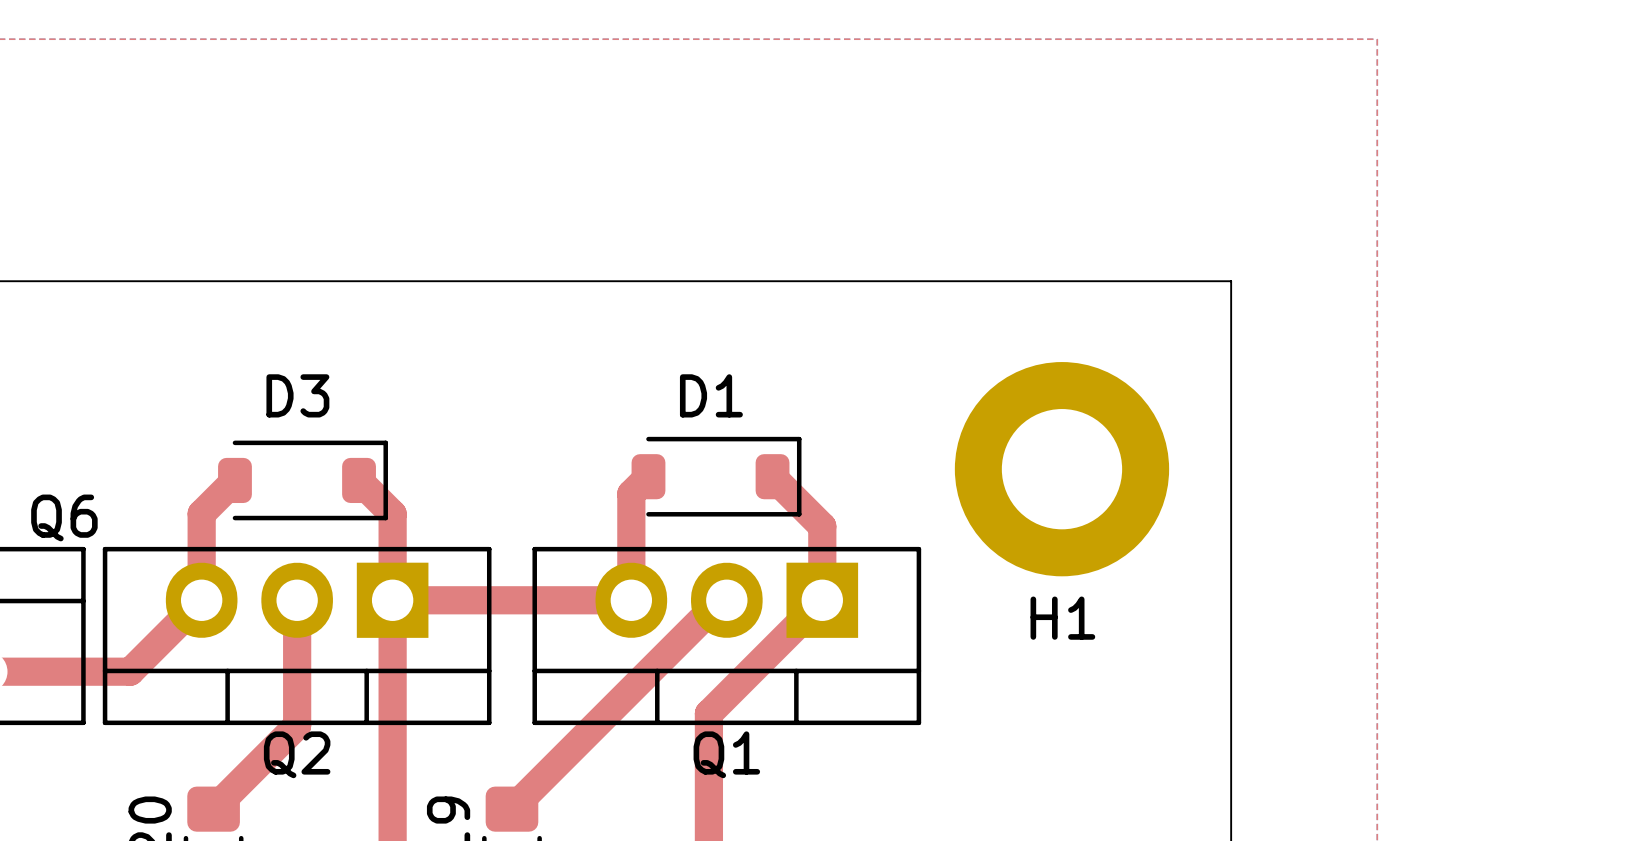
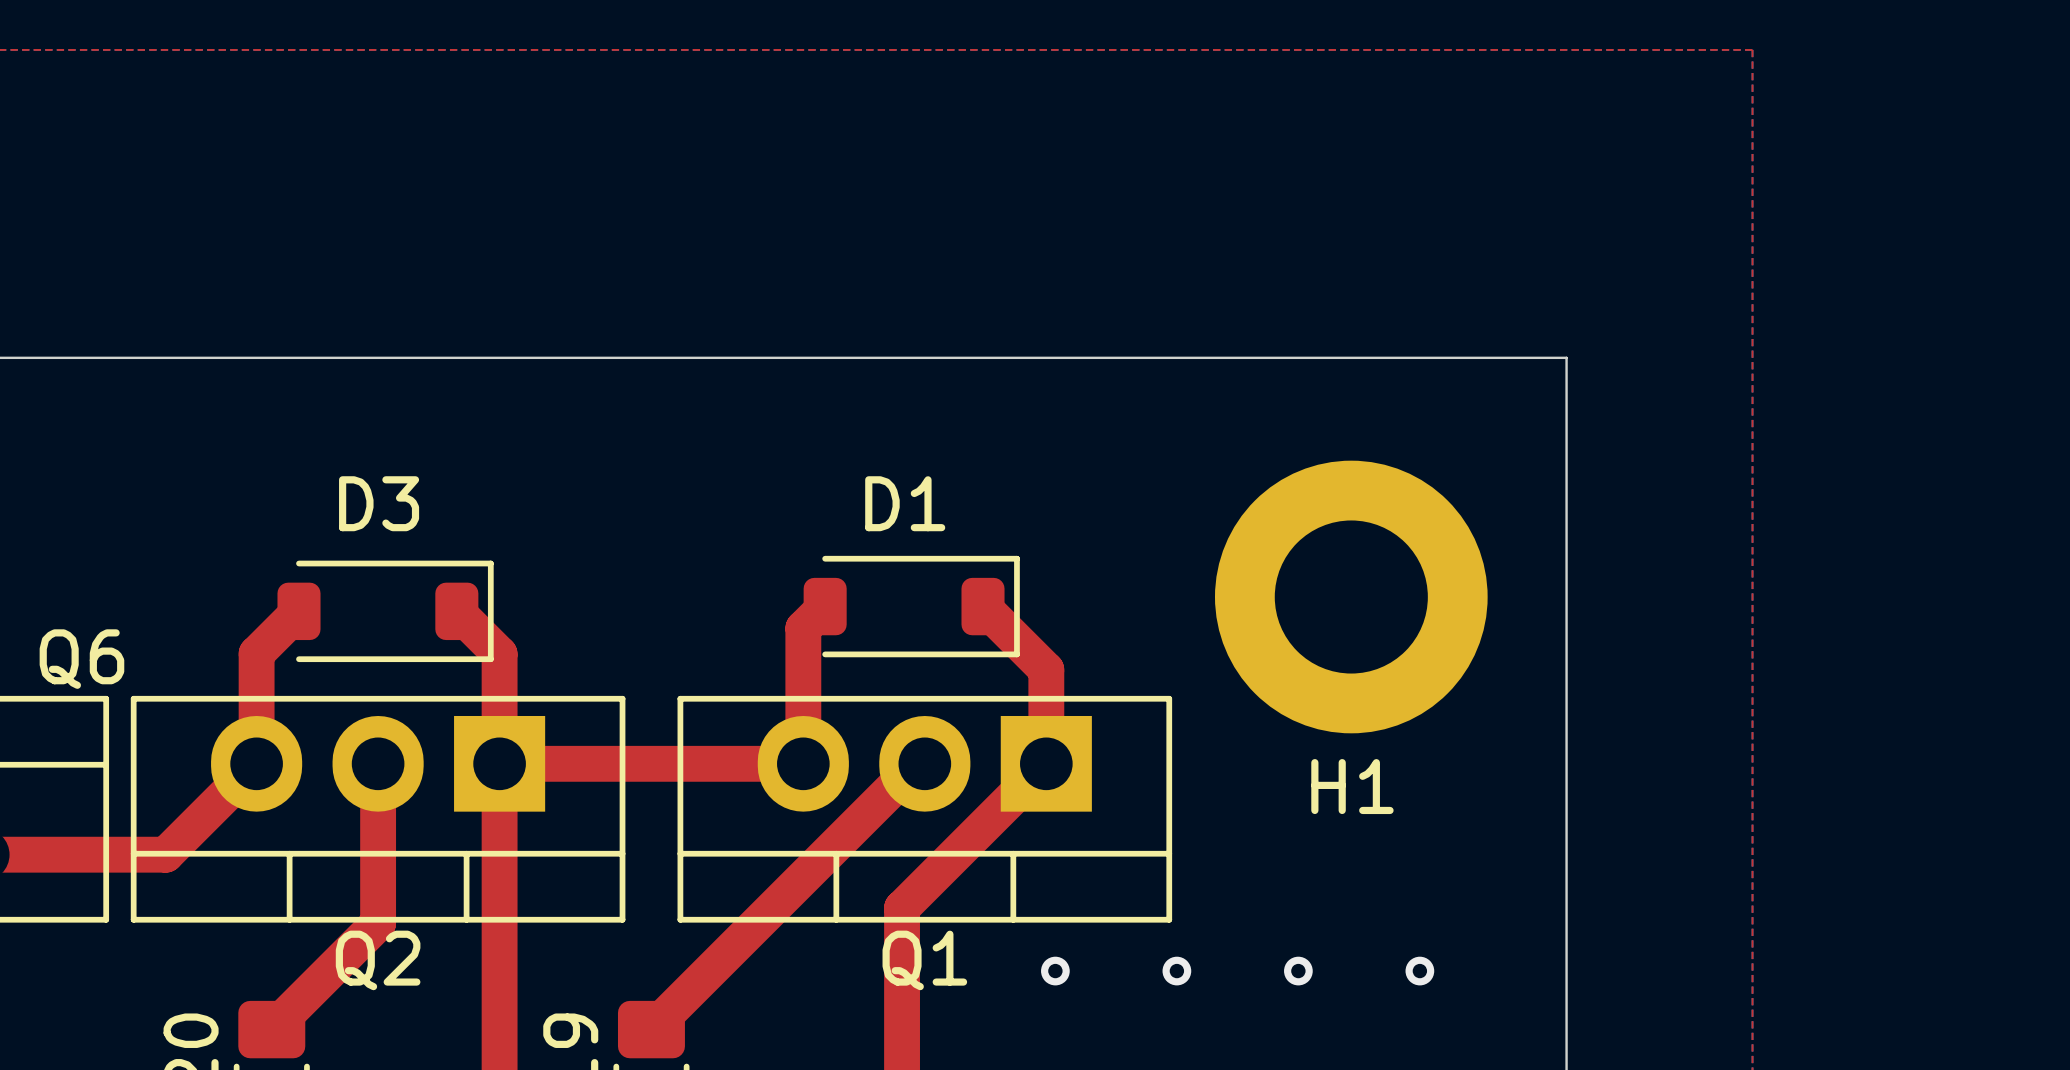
via: none -> (1055, 971)
via: none -> (1176, 971)
via: none -> (1298, 971)
via: none -> (1419, 971)

